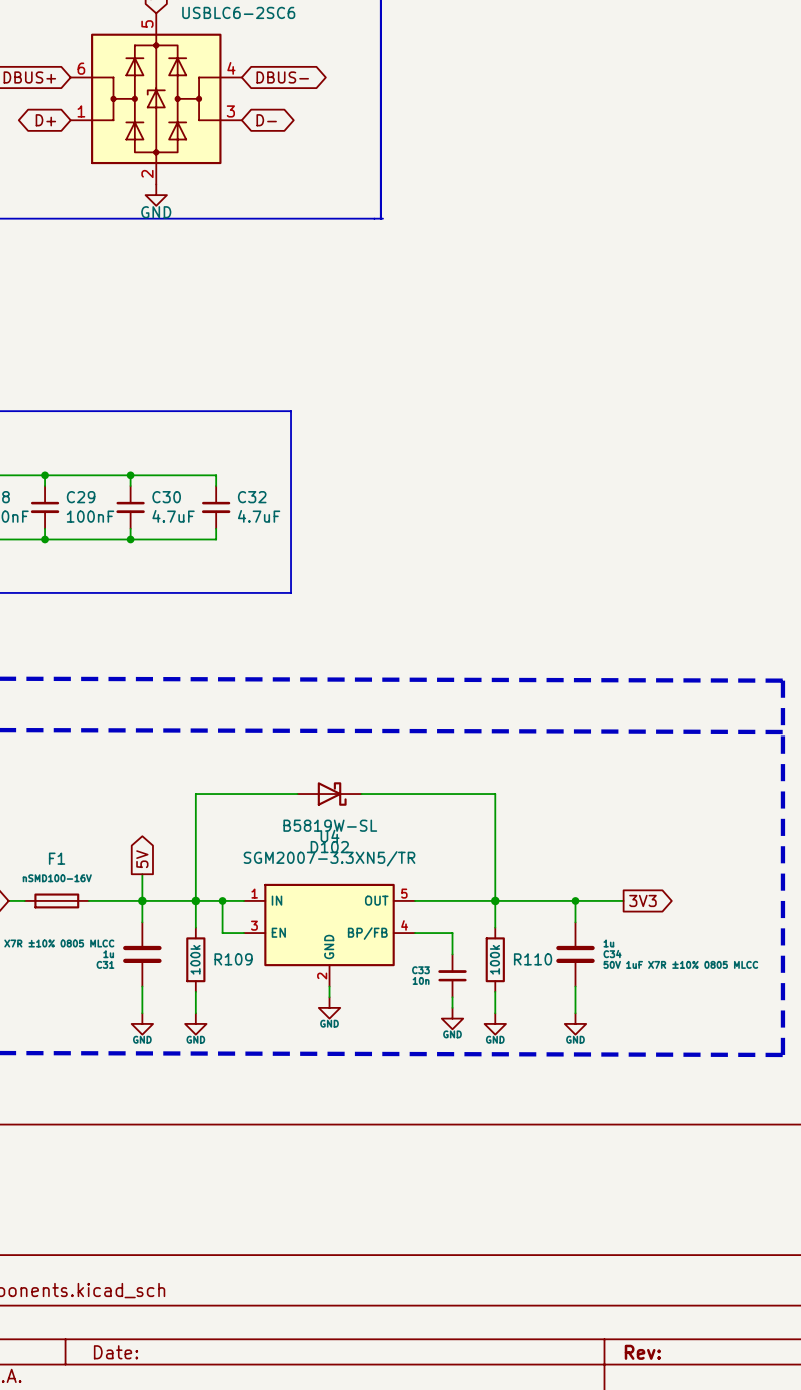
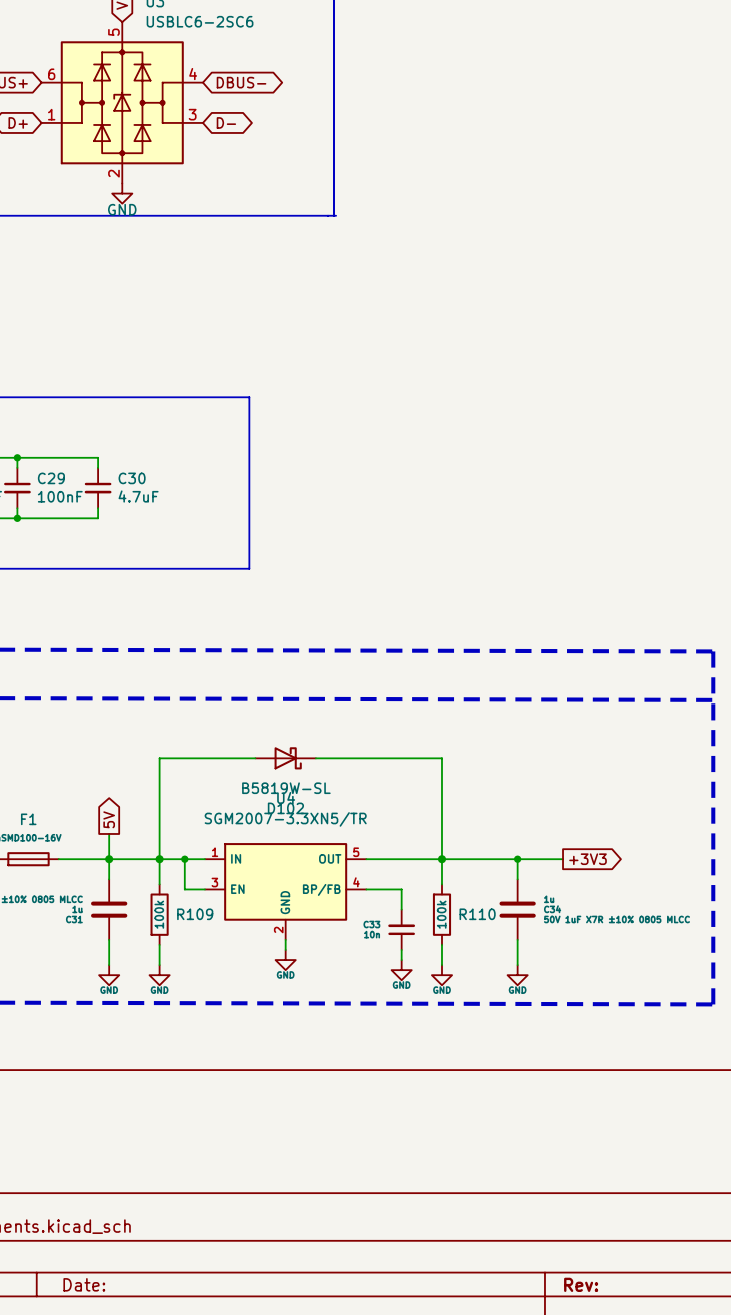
wire: (130, 475) (216, 475) (216, 486) -> none
junction: (130, 475) -> none
C32: 4.7uF (216, 507) -> none
wire: (216, 528) (216, 539) (130, 539) -> none
junction: (130, 539) -> none
global label: 3V3 (642, 900) -> +3V3 (588, 859)

